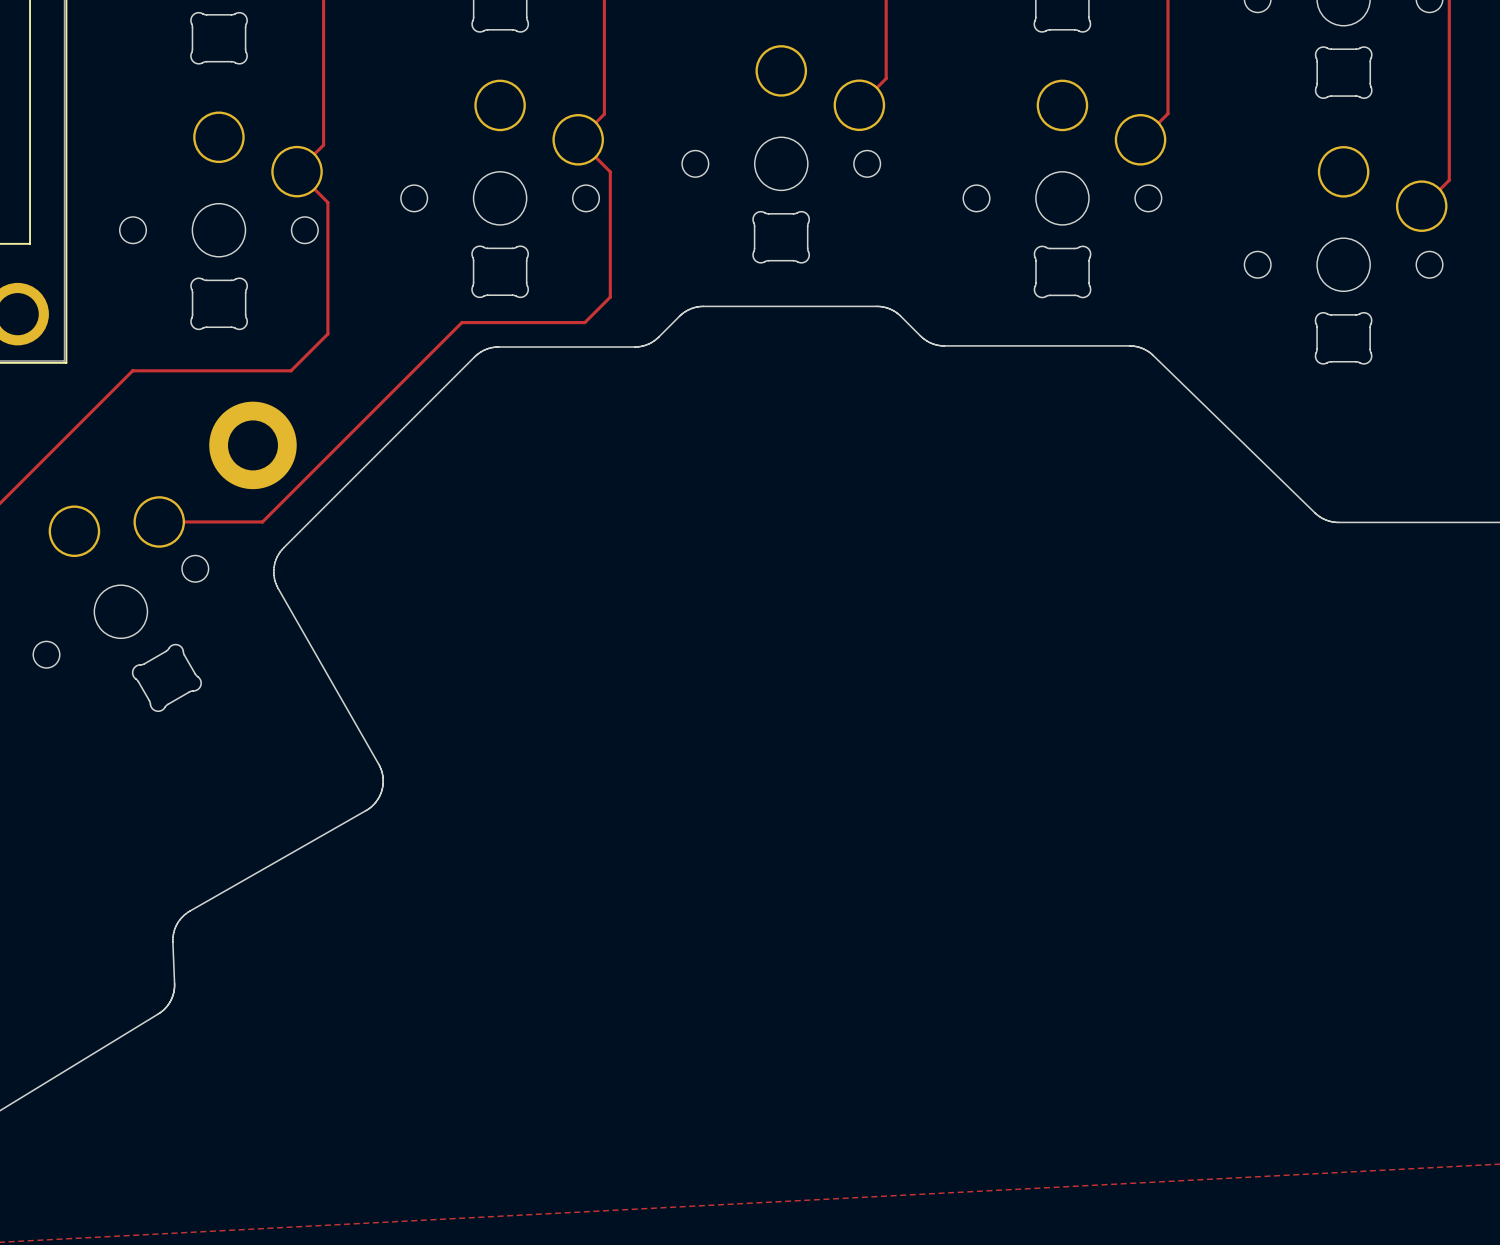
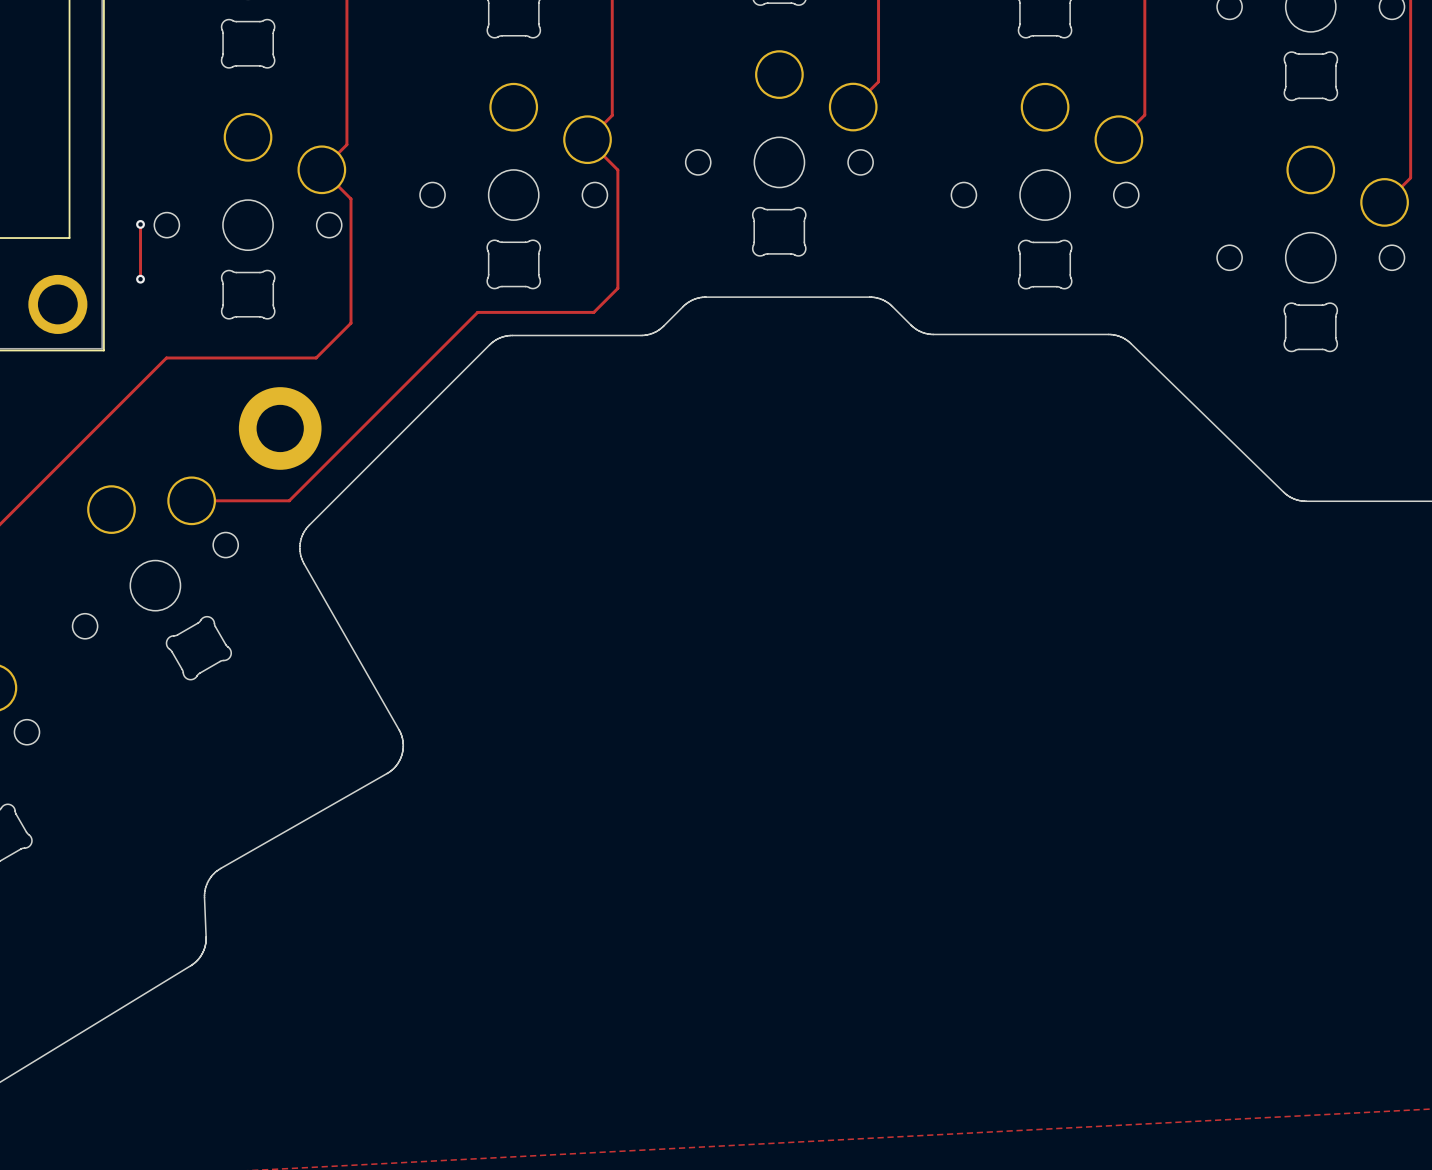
track: none -> (140, 224) (140, 279)
via: none -> (140, 224)
via: none -> (140, 279)

